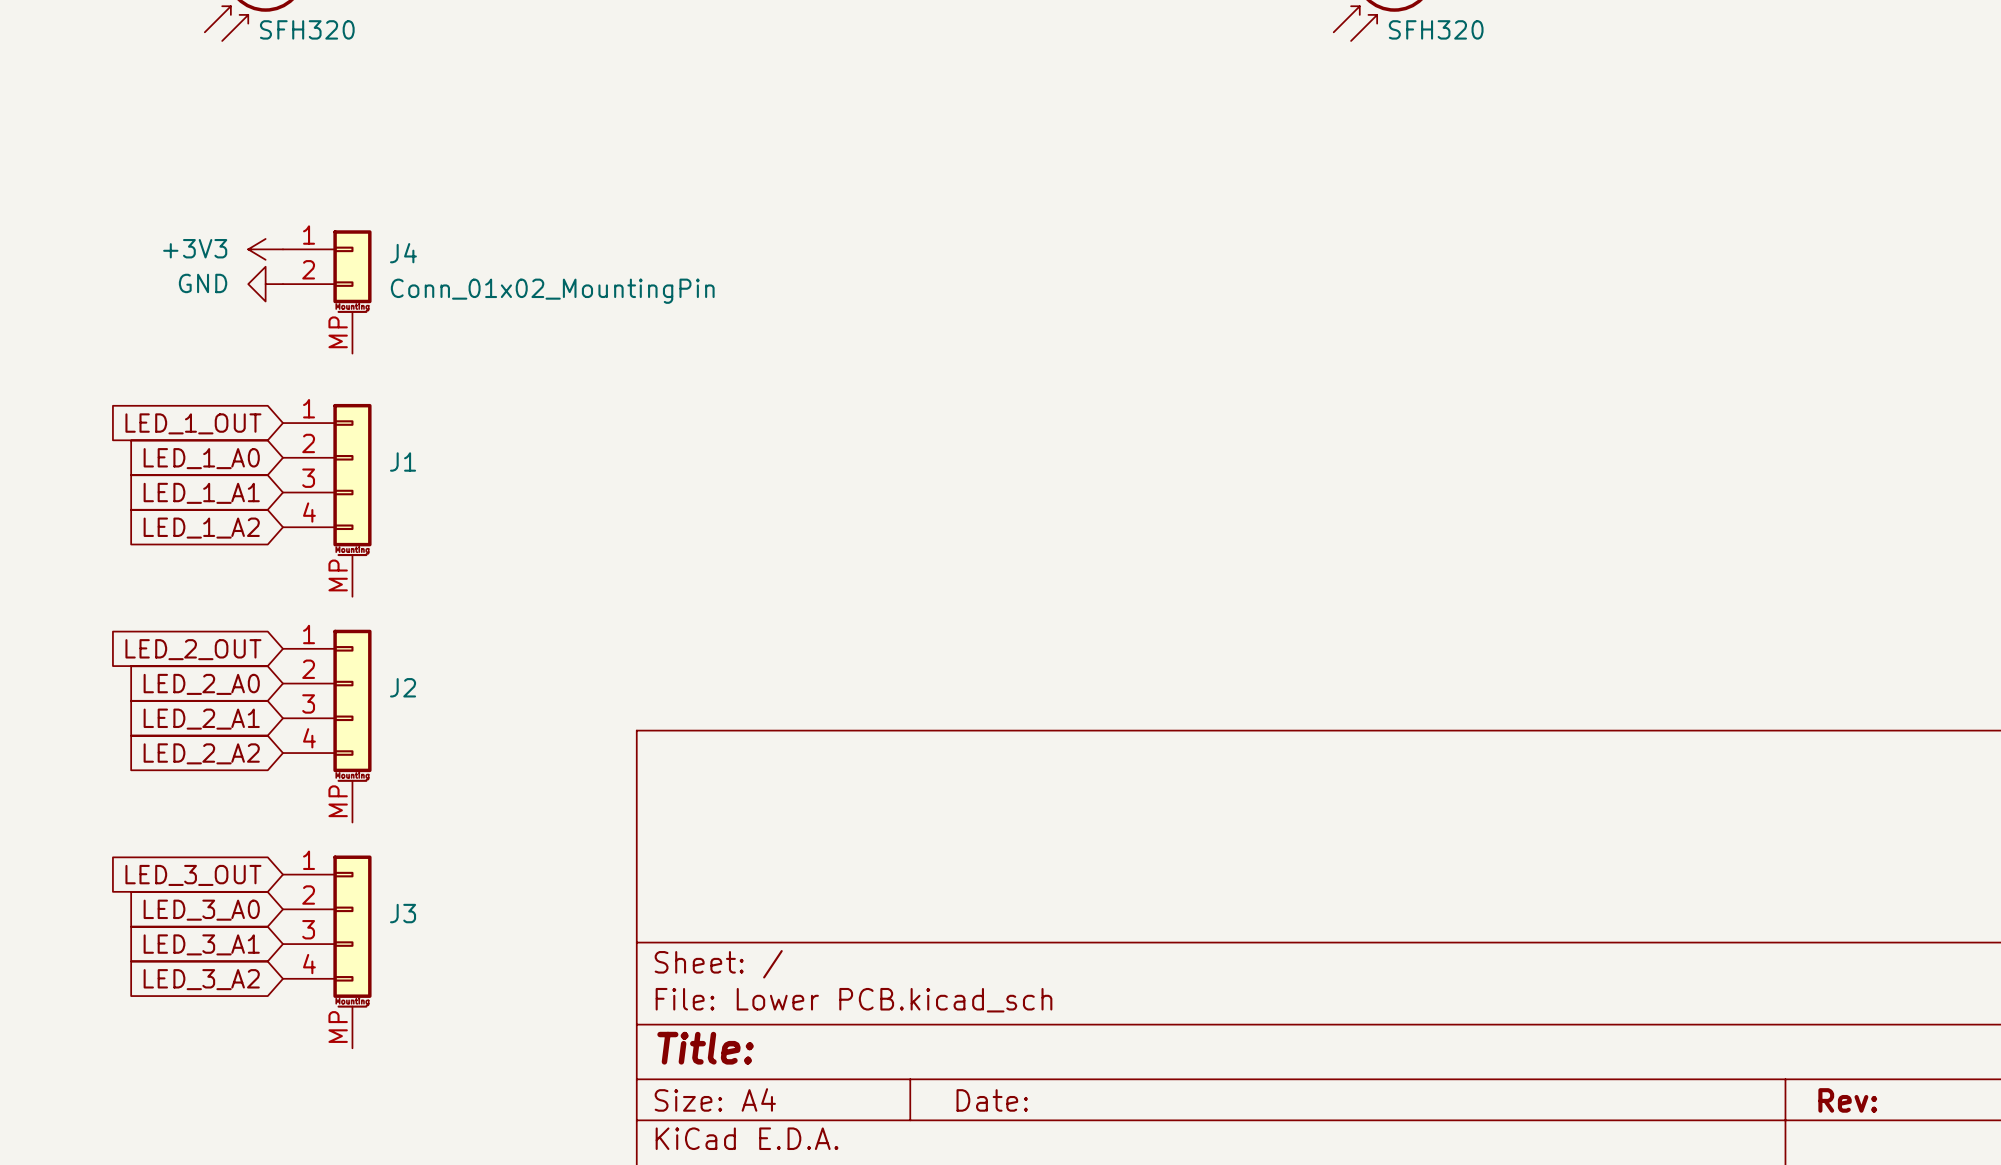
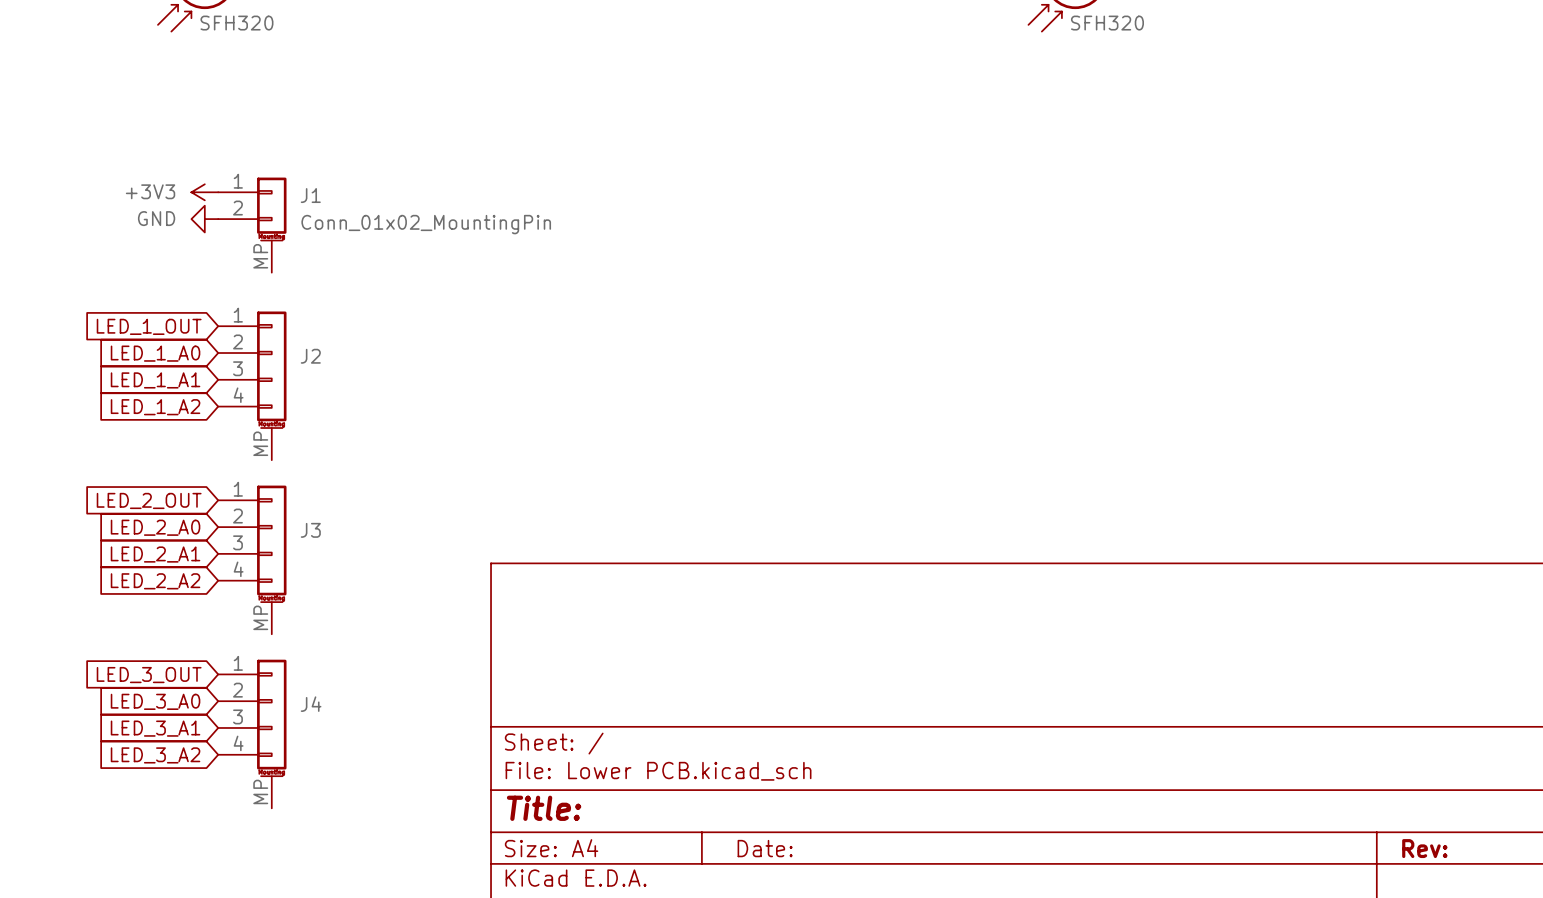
J4 name: J4 (403, 253) -> J1 (310, 195)
J1 name: J1 (403, 461) -> J2 (310, 356)
J2 name: J2 (403, 687) -> J3 (310, 530)
J3 name: J3 (403, 913) -> J4 (311, 704)

